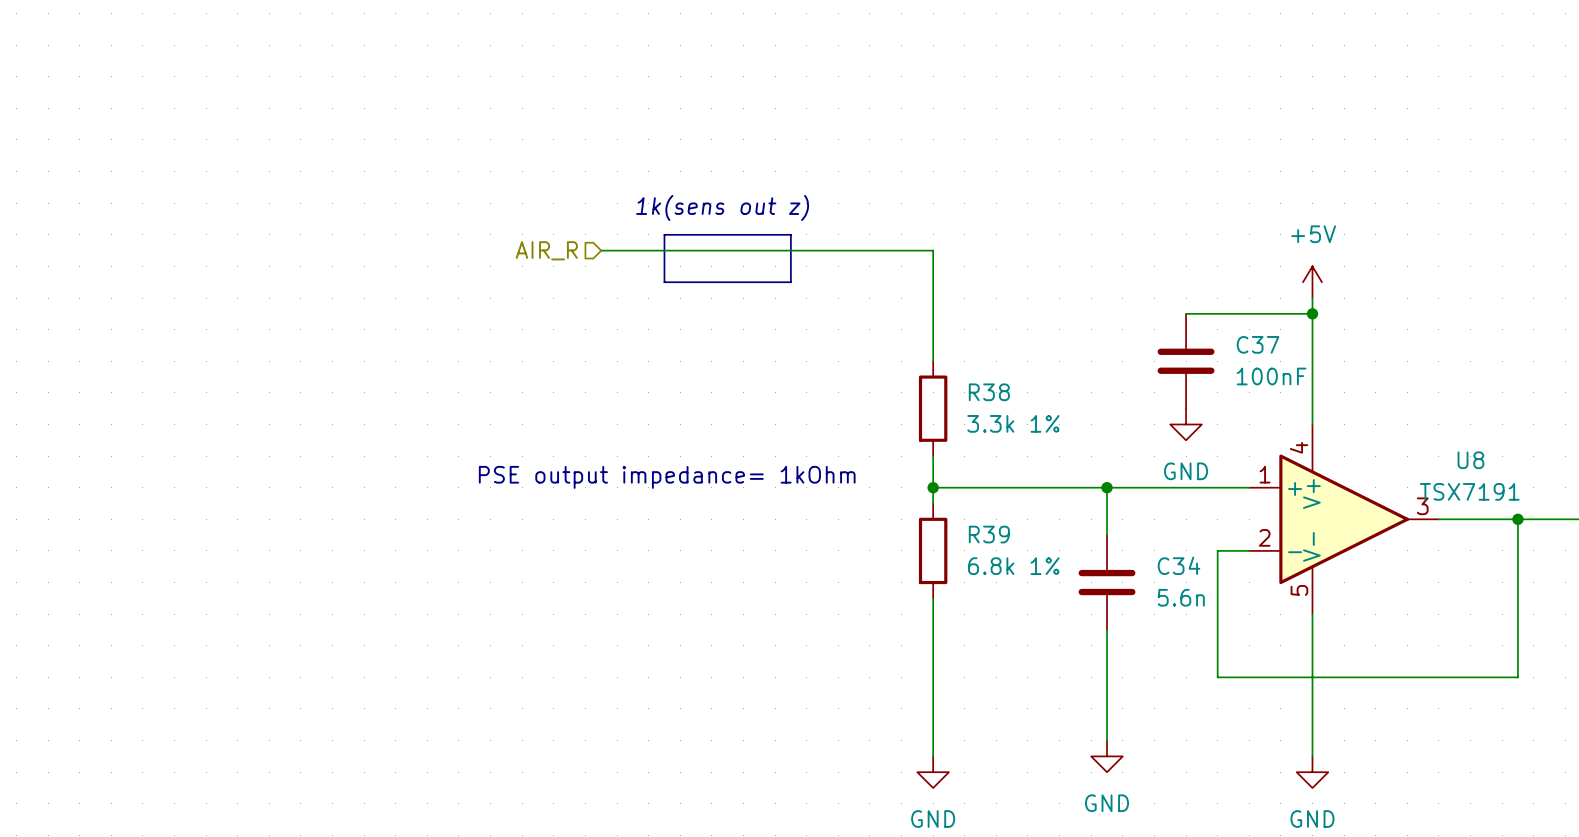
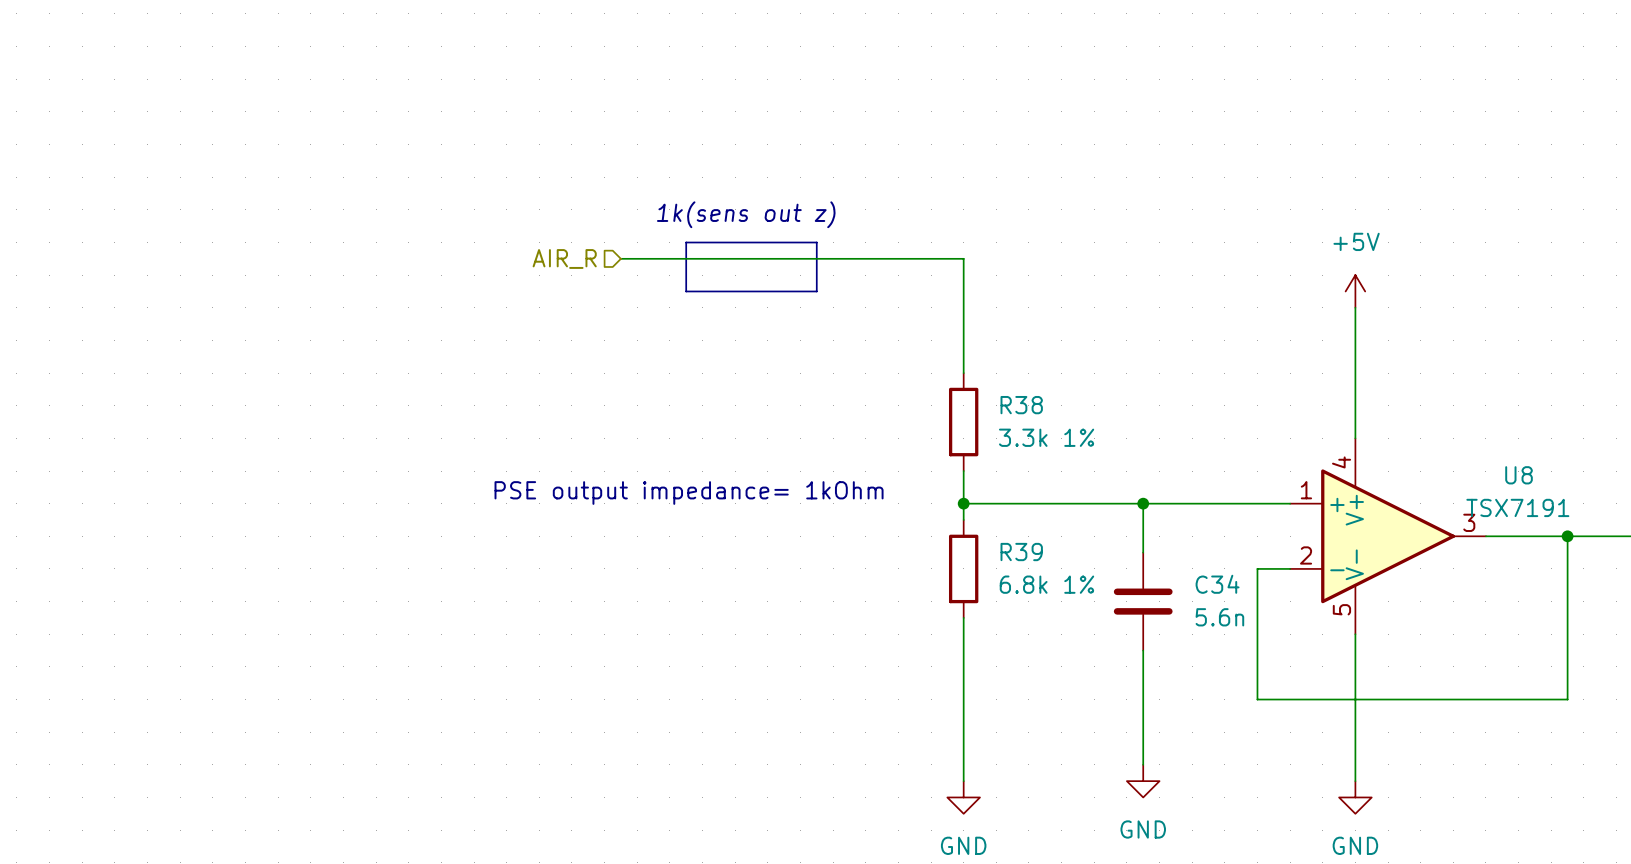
wire: (1186, 313) (1312, 313) -> none
junction: (1312, 313) -> none
C37: 100nF (1186, 361) -> none
power symbol: GND (1186, 424) -> none

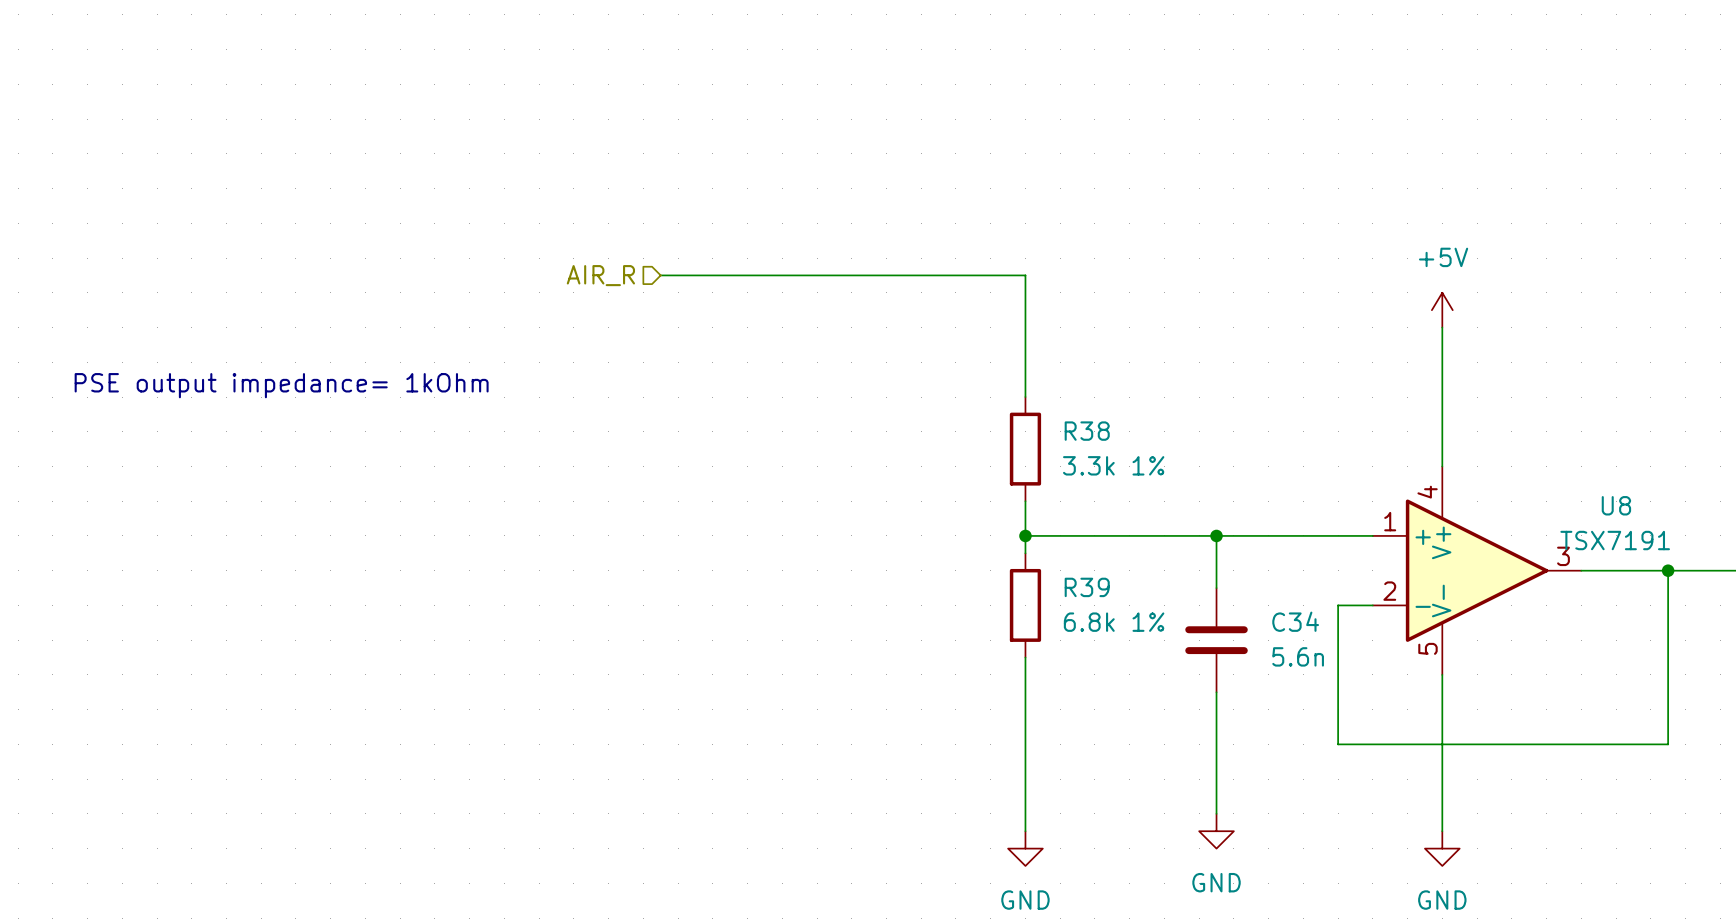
text: 1k(sens out z) (746, 214) -> none
line: (686, 242) (686, 291) (816, 291) (816, 242) (686, 242) -> none
text: none -> PSE output impedance= 1kOhm (281, 385)
text: PSE output impedance= 1kOhm (689, 493) -> none

